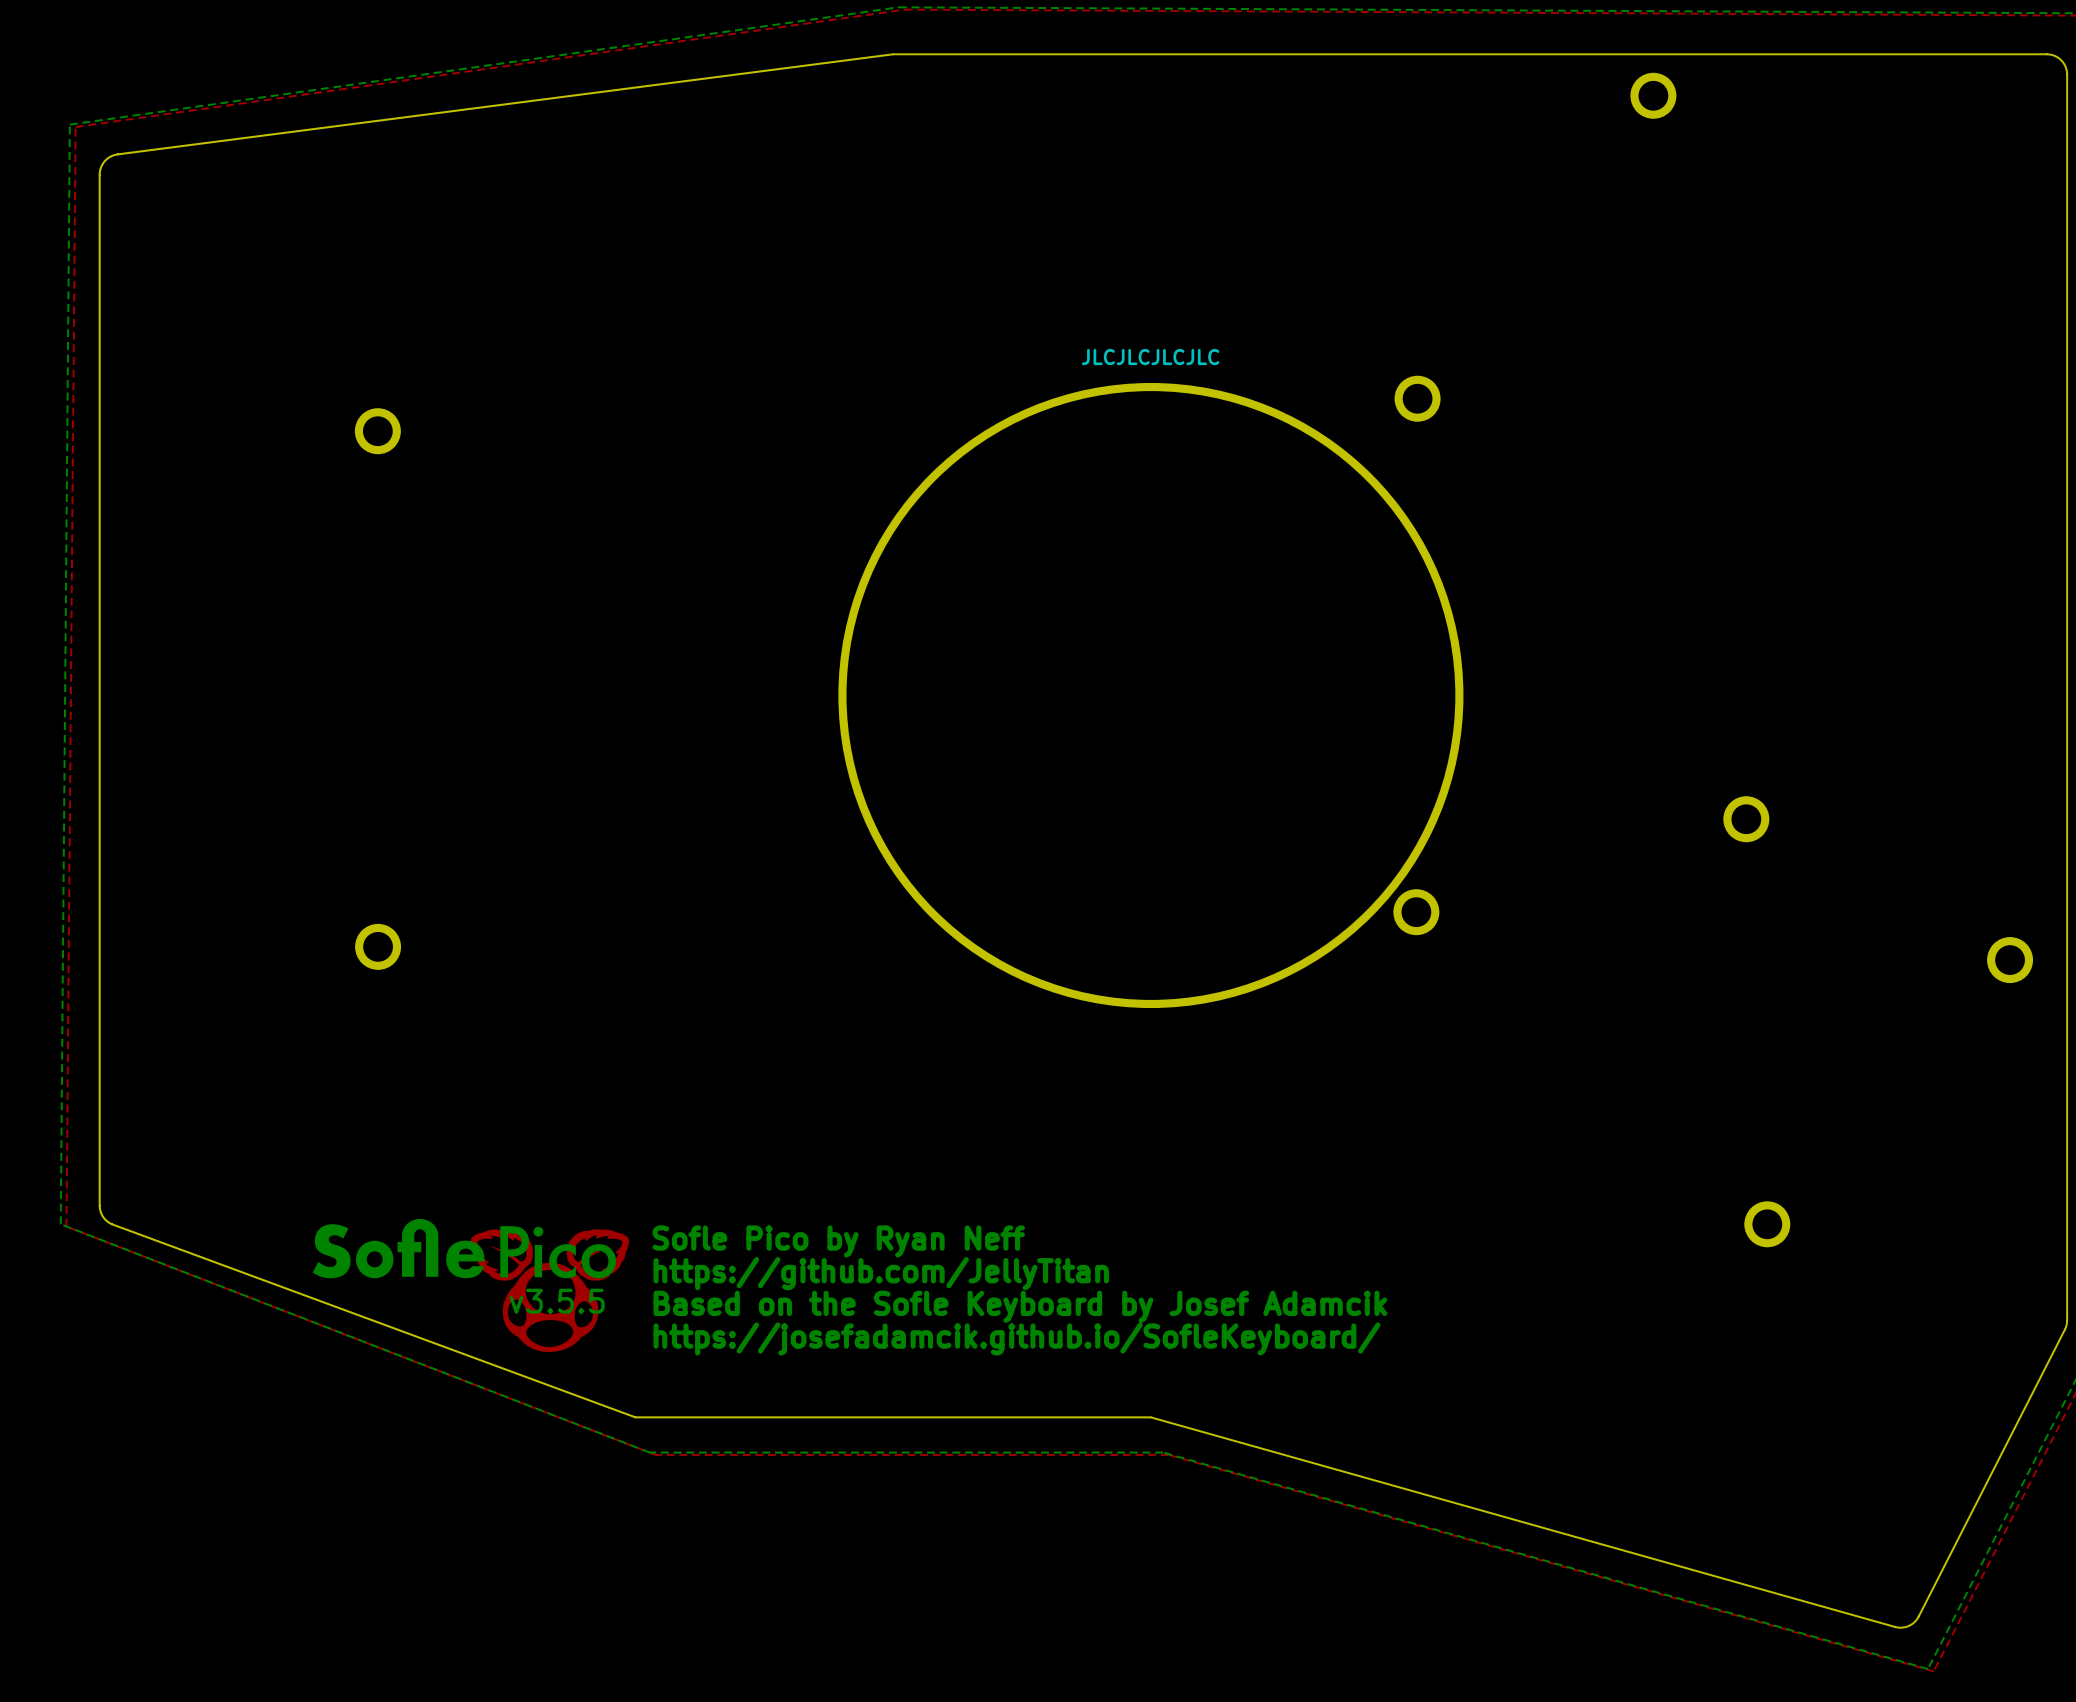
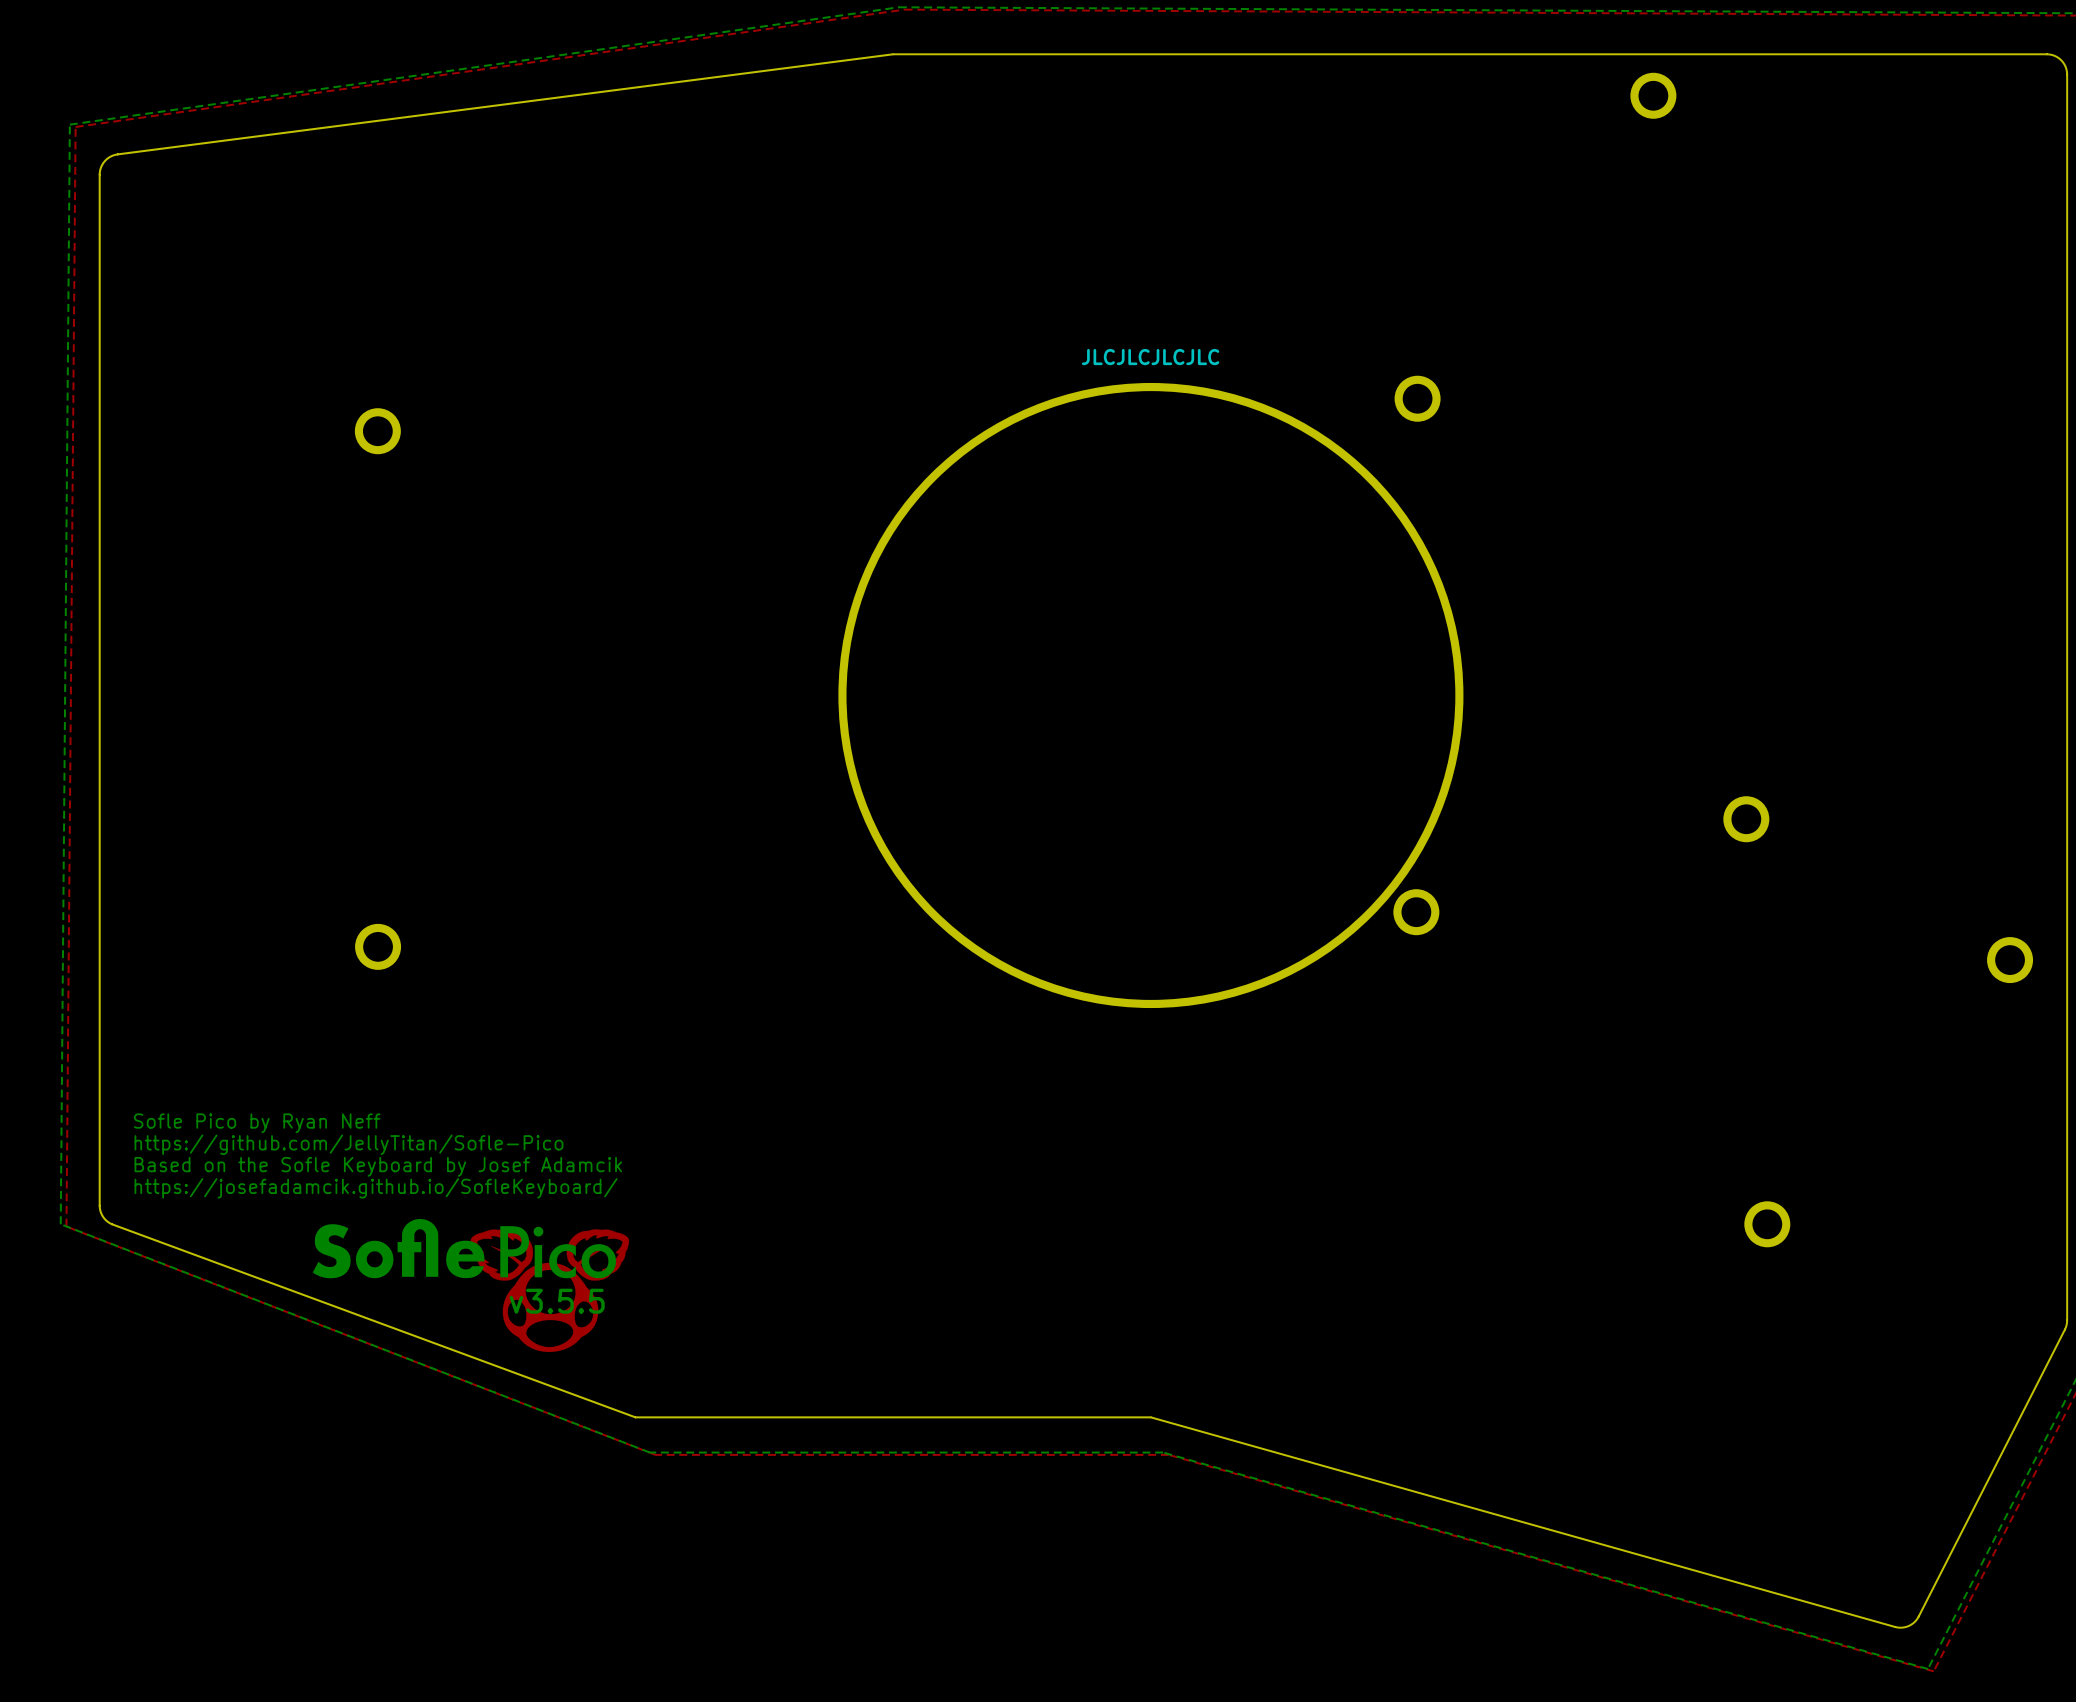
text: none -> Sofle Pico by Ryan Neff (257, 1123)
text: none -> https://github.com/JellyTitan/Sofle-Pico (348, 1144)
text: none -> Based on the Sofle Keyboard by Josef Adamcik (378, 1166)
text: none -> https://josefadamcik.github.io/SofleKeyboard/ (376, 1188)
text: Sofle Pico by Ryan Neff (838, 1241) -> none
text: https://github.com/JellyTitan (881, 1273) -> none
text: Based on the Sofle Keyboard by Josef Adamcik (1020, 1306) -> none
text: https://josefadamcik.github.io/SofleKeyboard/ (1017, 1338) -> none

